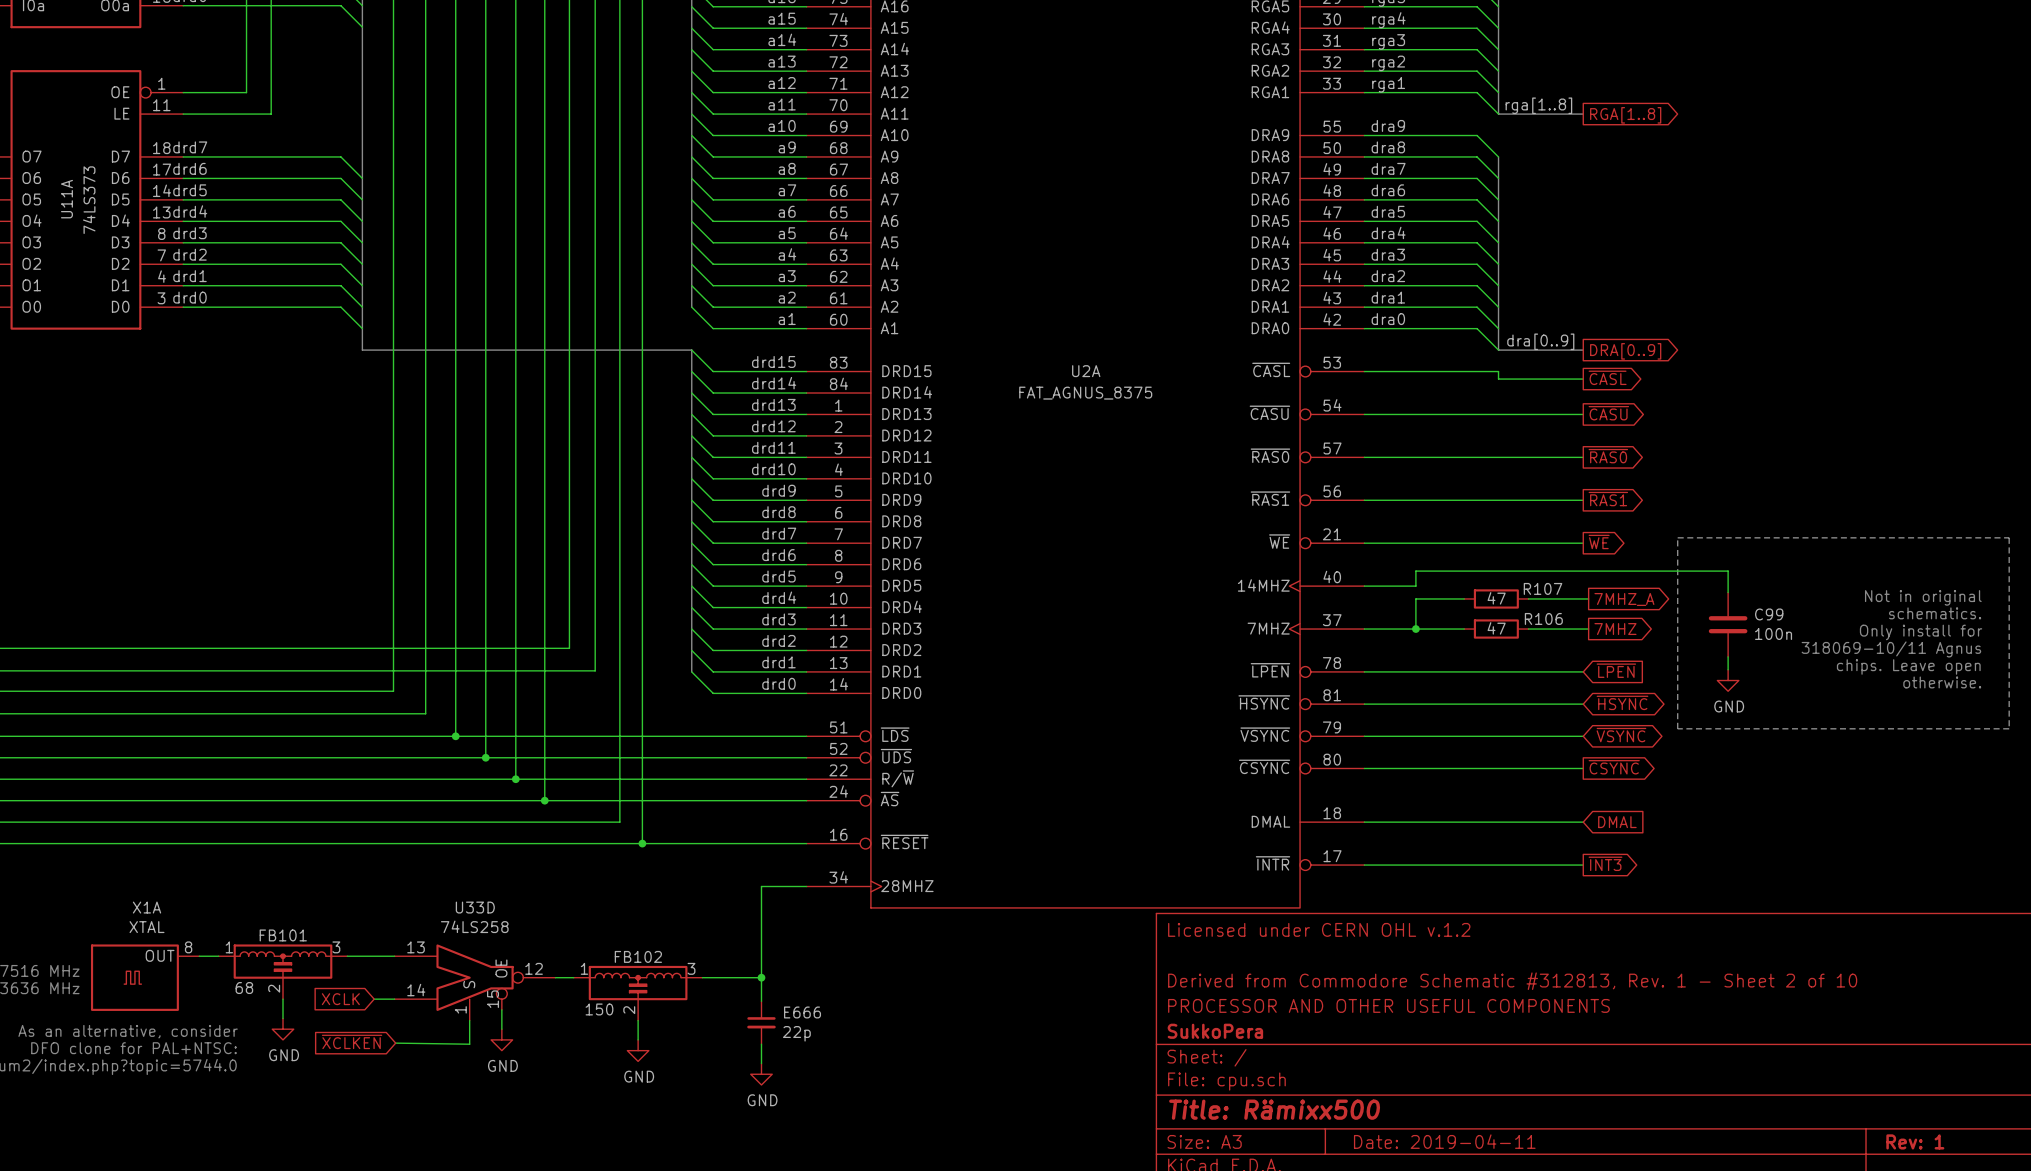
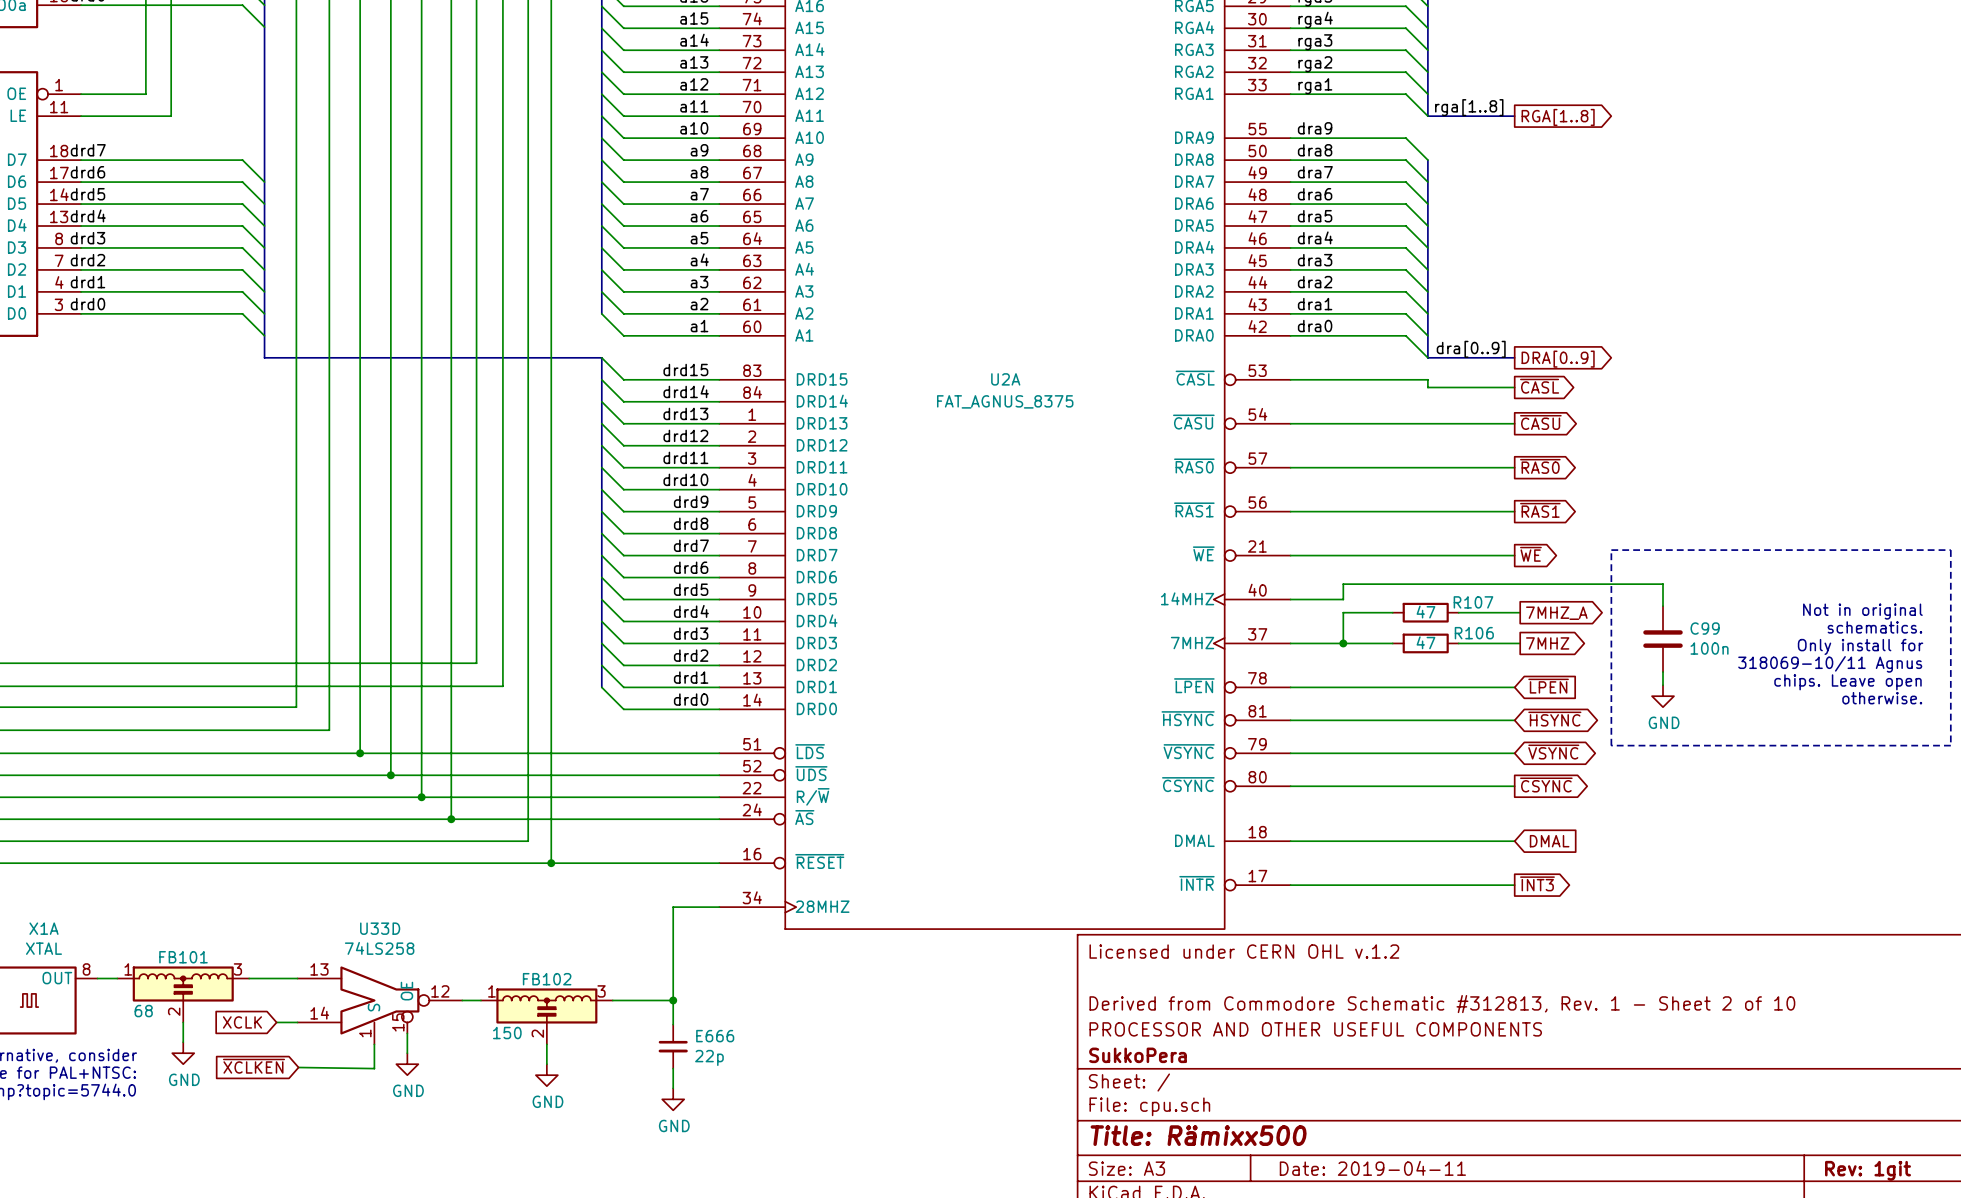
title block: Rev: 1 (1915, 1141) -> Rev: 1git (1868, 1170)

